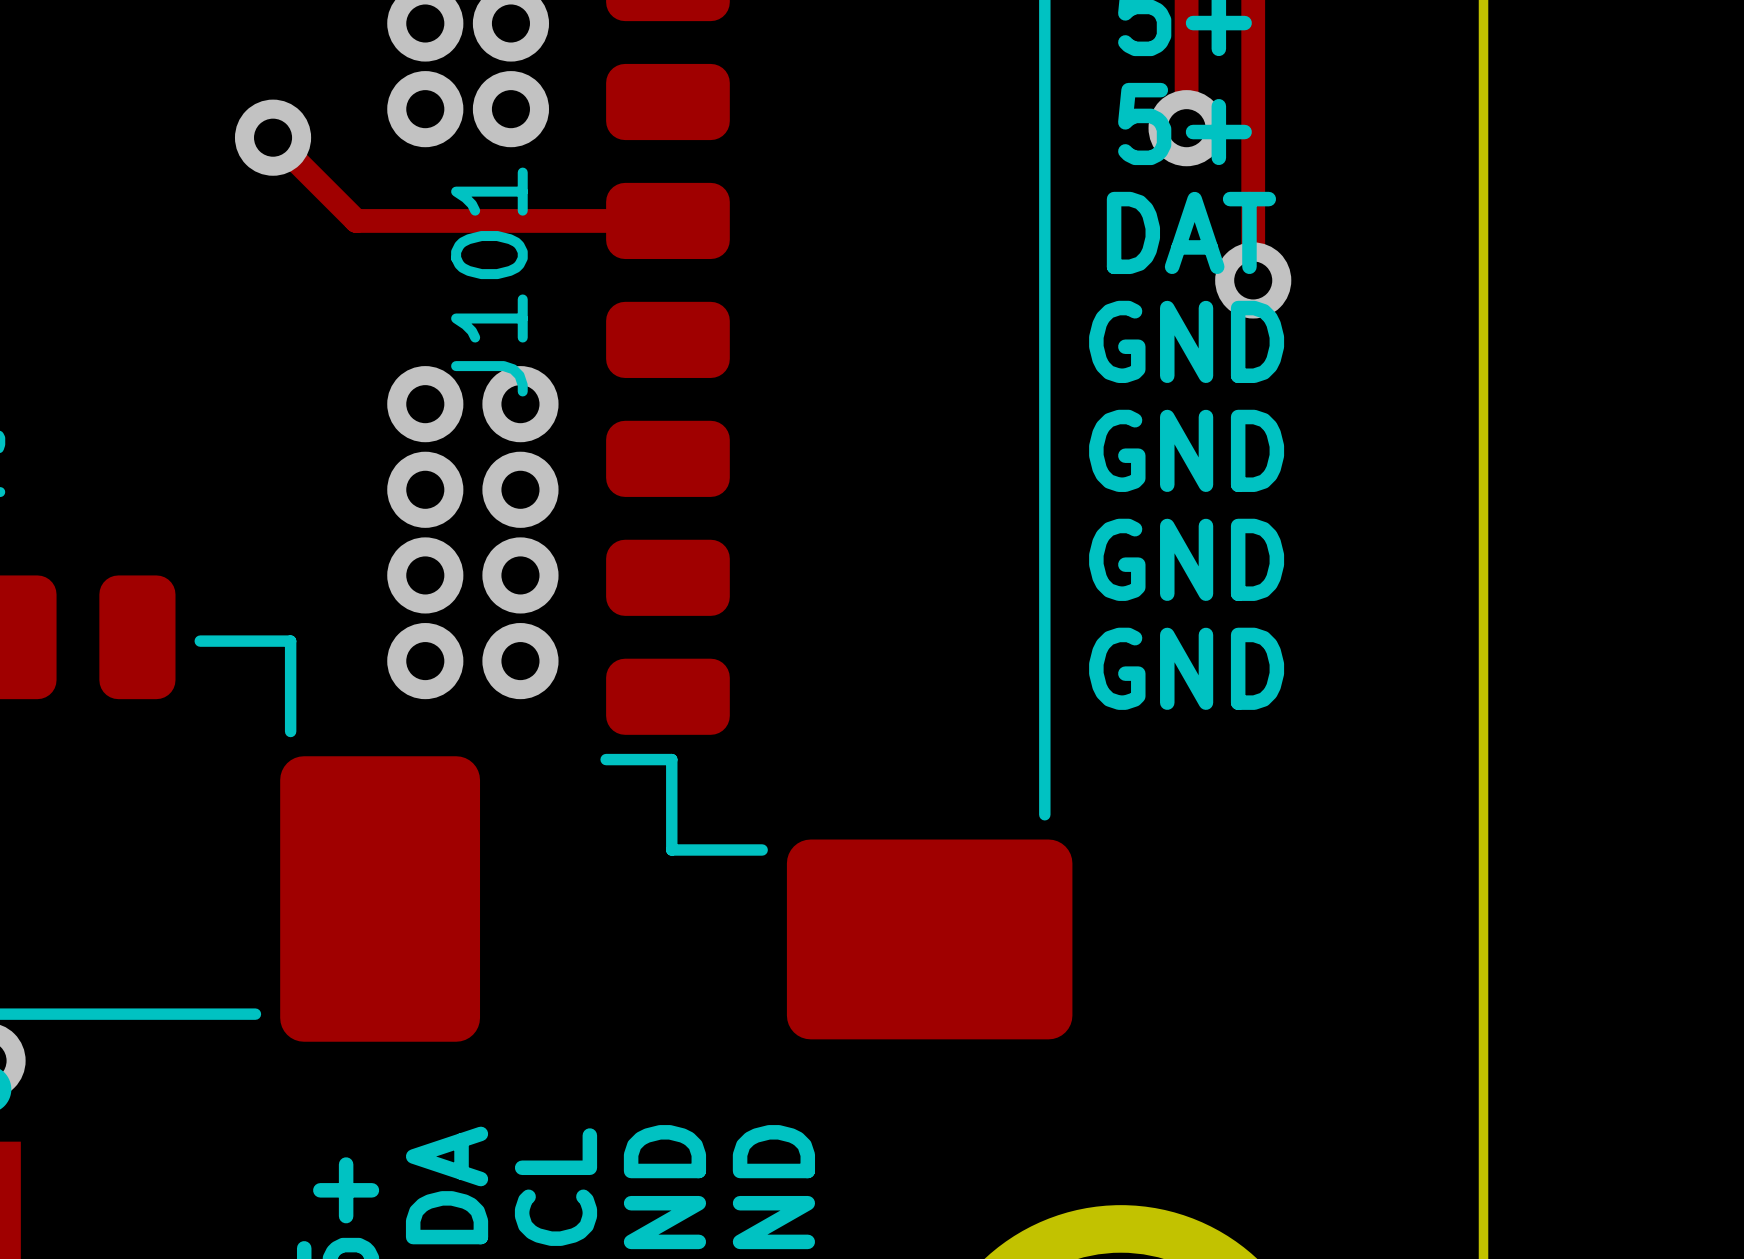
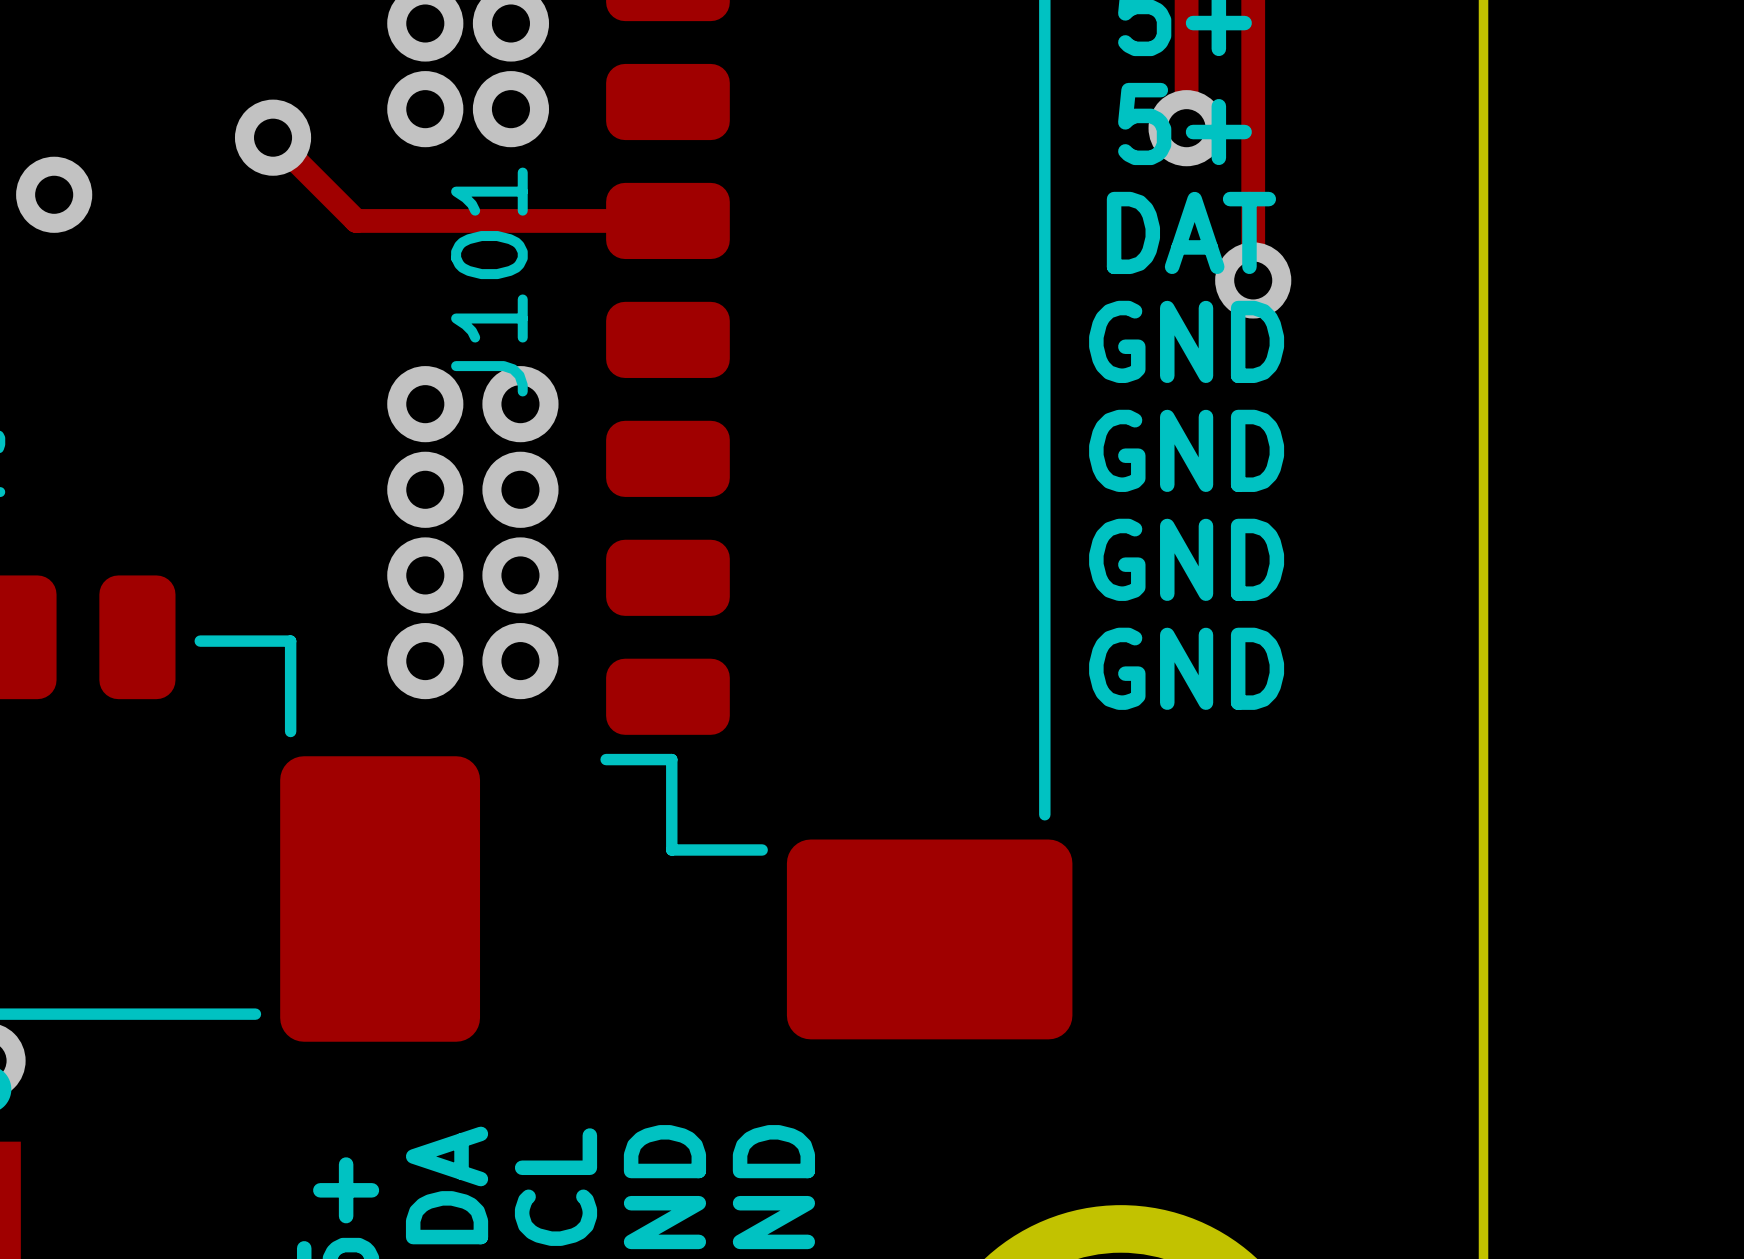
via: none -> (54, 194)

